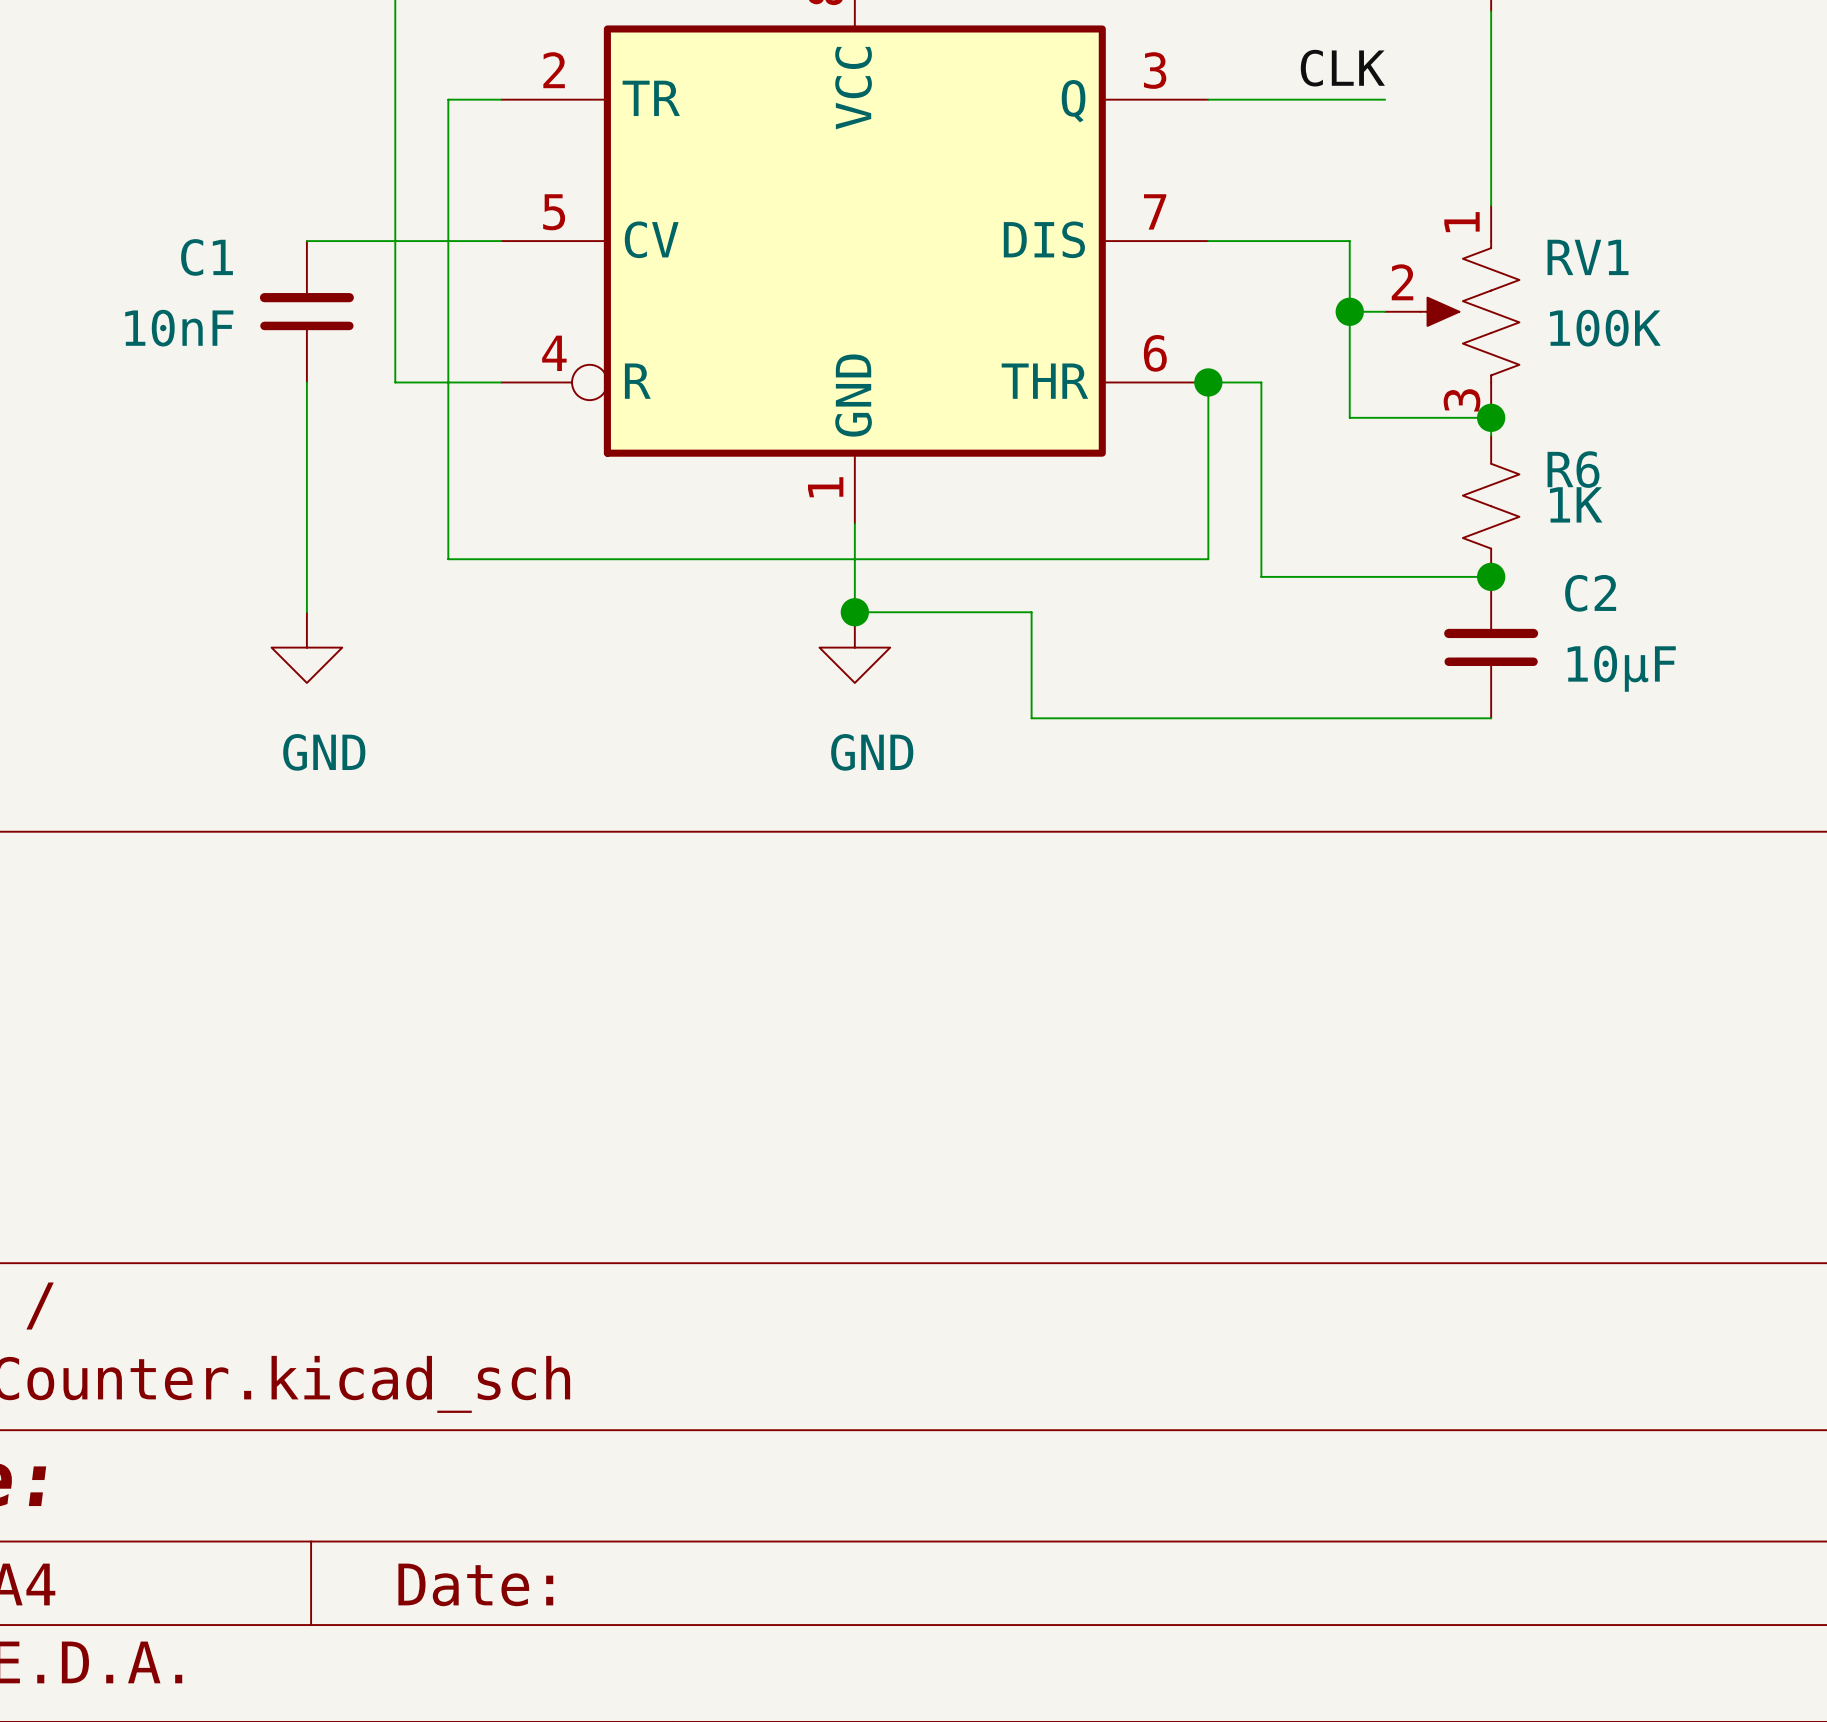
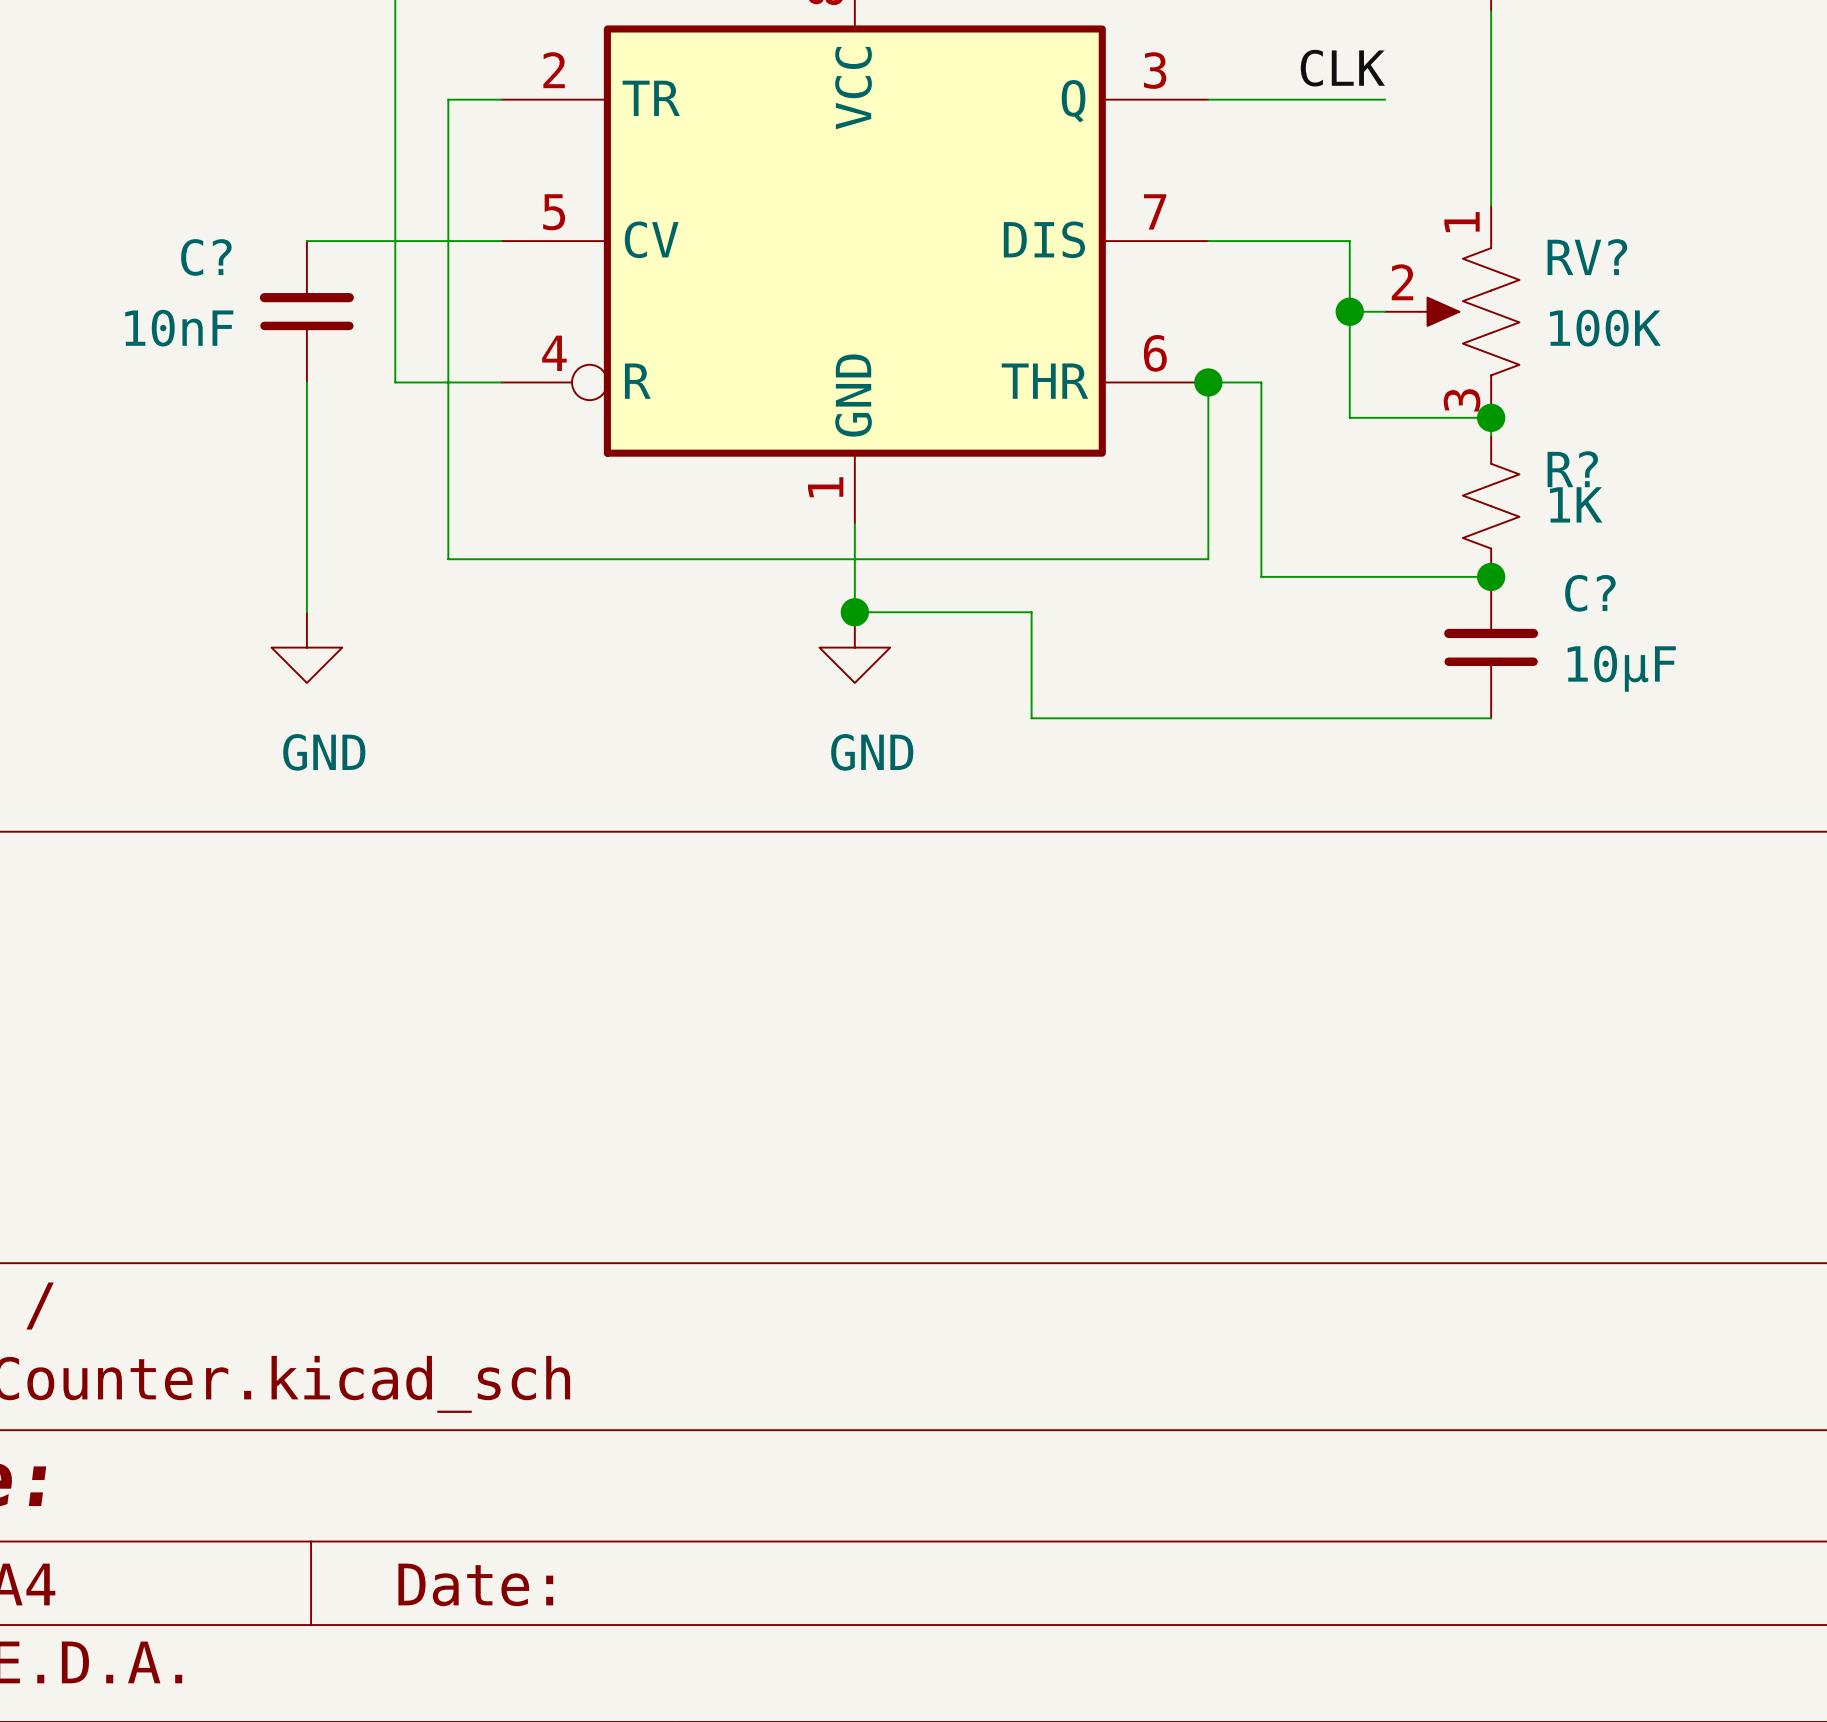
C1 name: C1 (207, 257) -> C? (206, 257)
RV1 name: RV1 (1588, 257) -> RV? (1587, 257)
R6 name: R6 (1573, 469) -> R? (1572, 469)
C2 name: C2 (1590, 593) -> C? (1590, 593)

